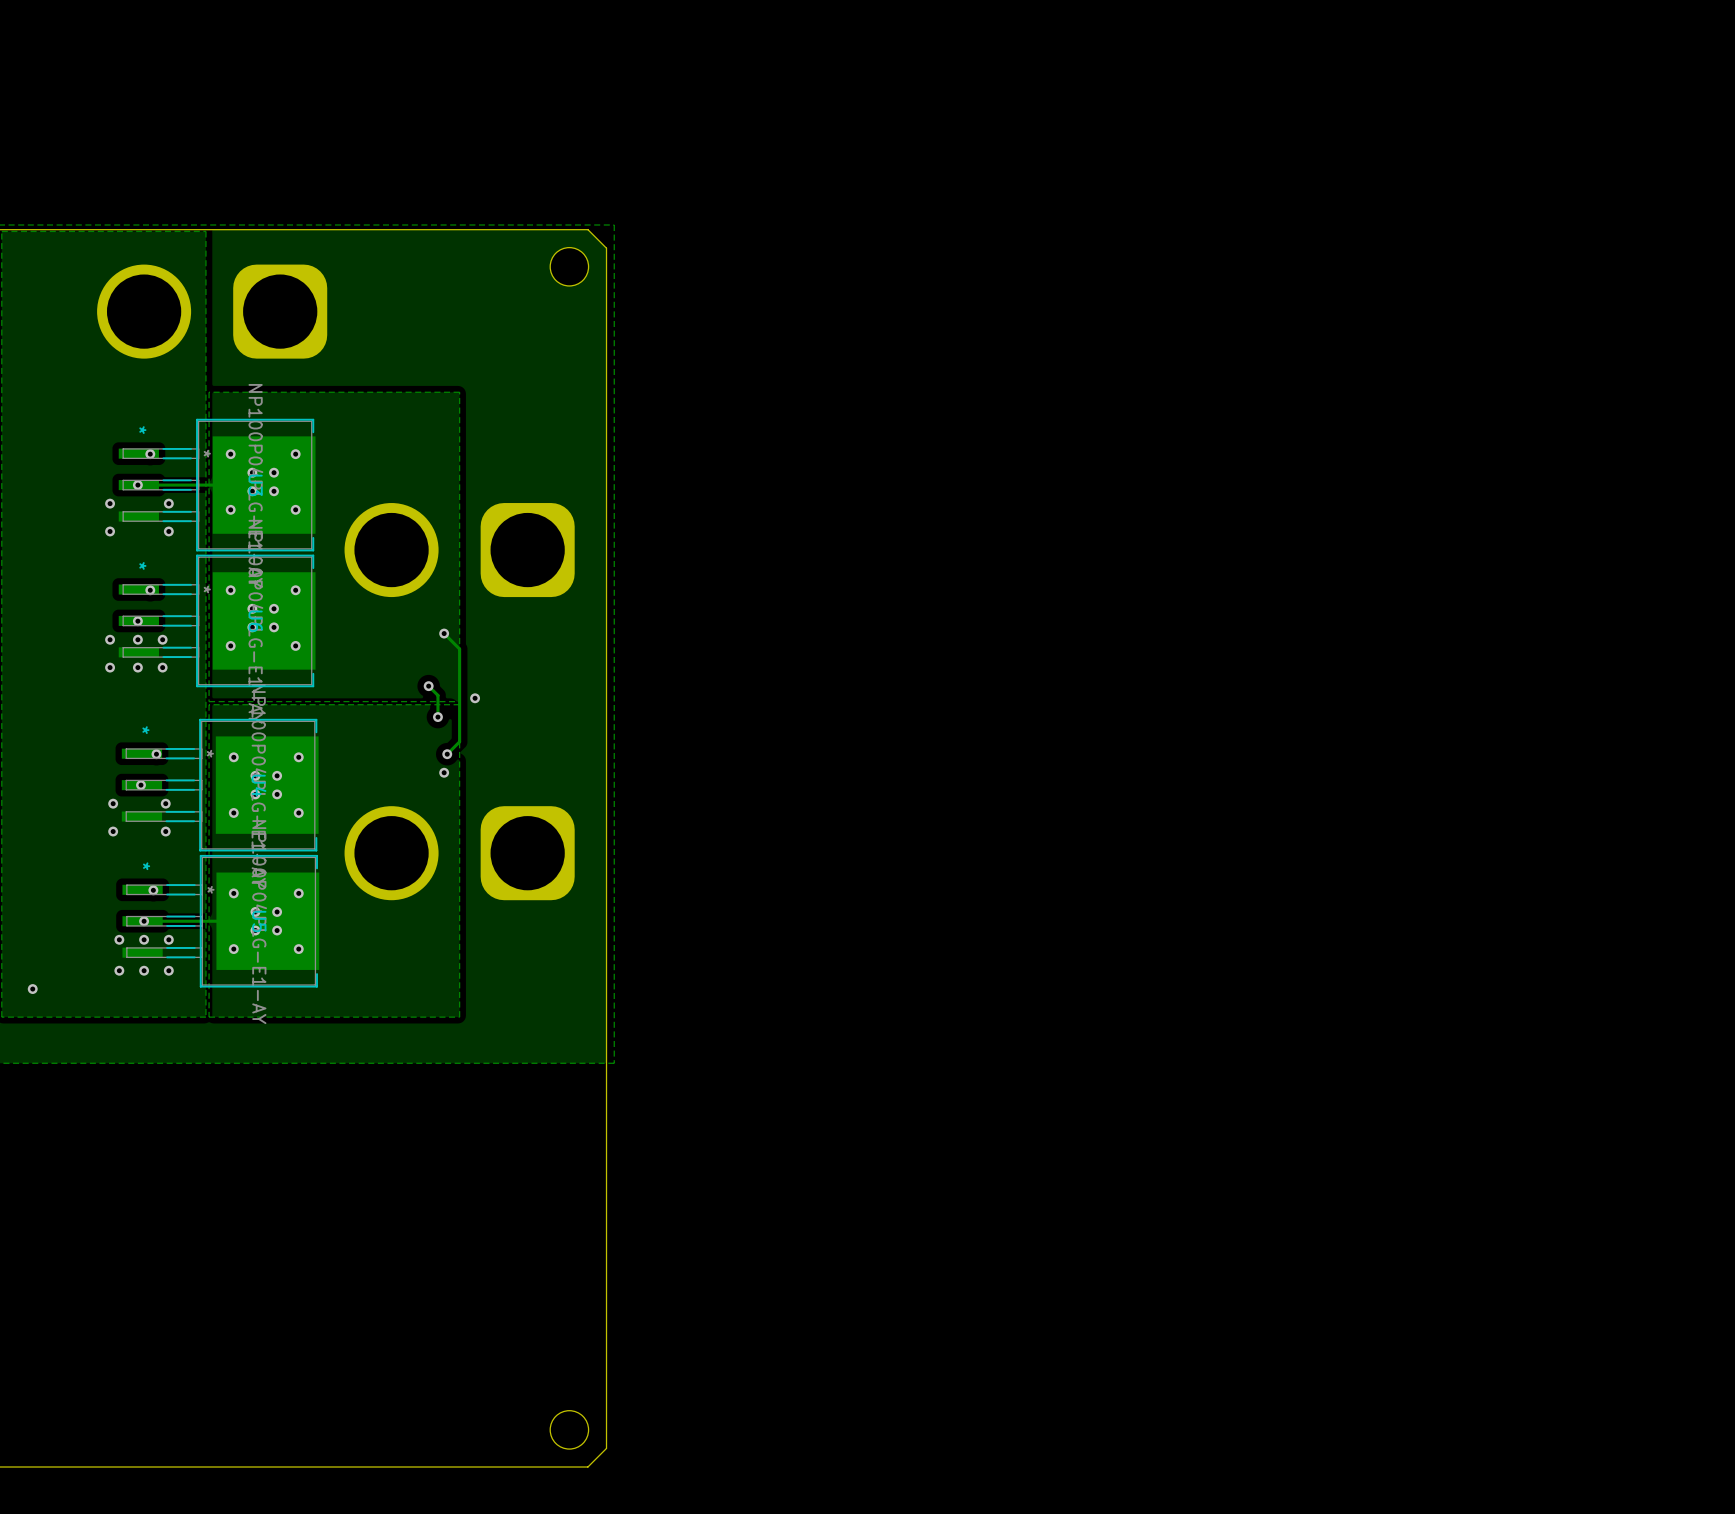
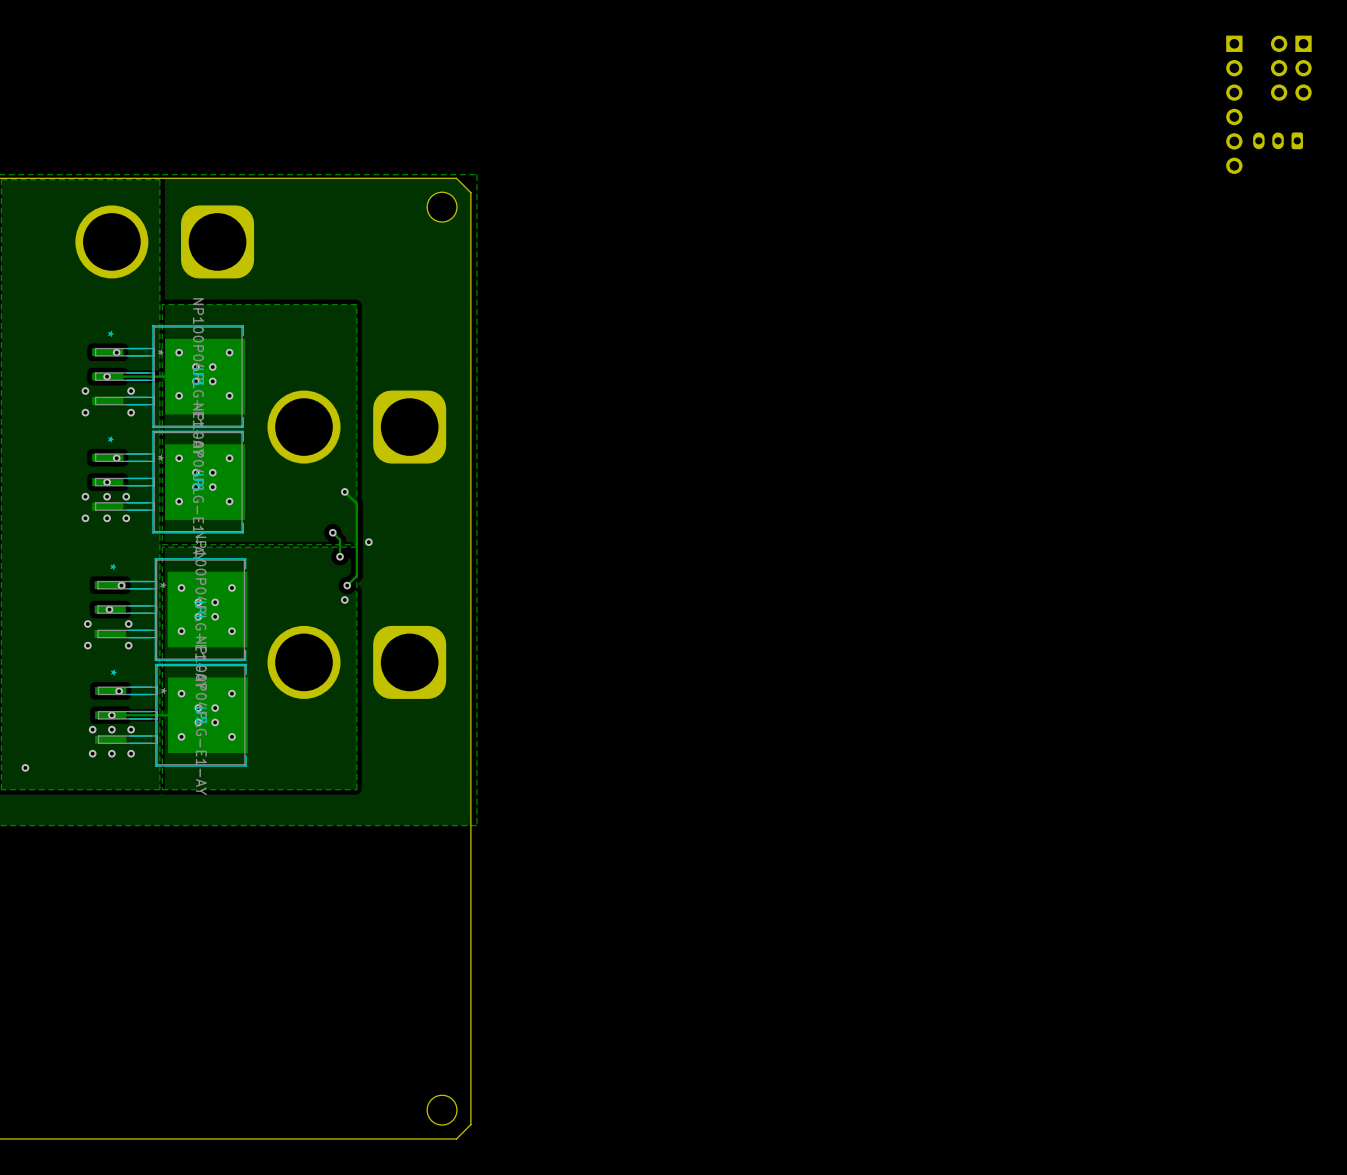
part: none -> (1291, 68)
part: none -> (1234, 104)
part: none -> (1278, 140)

